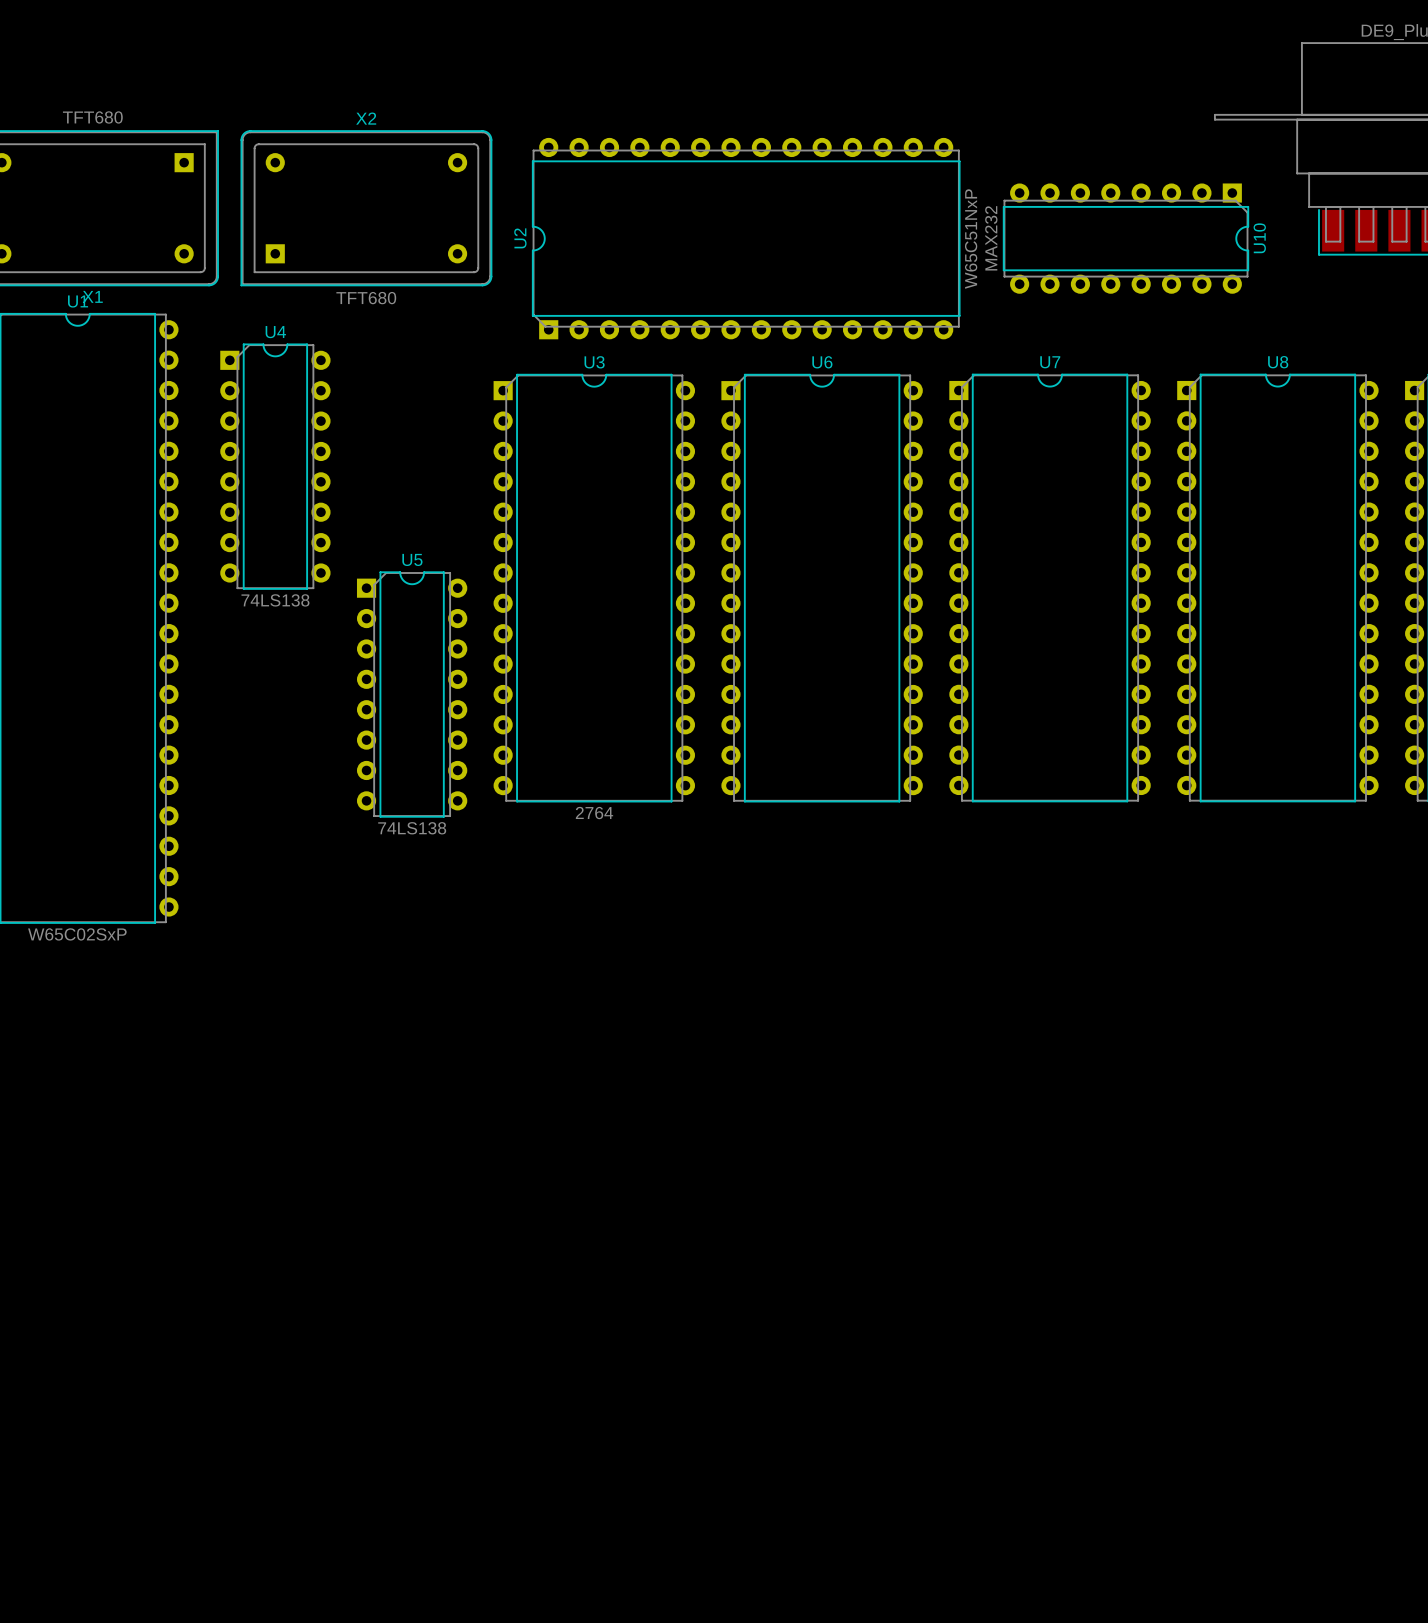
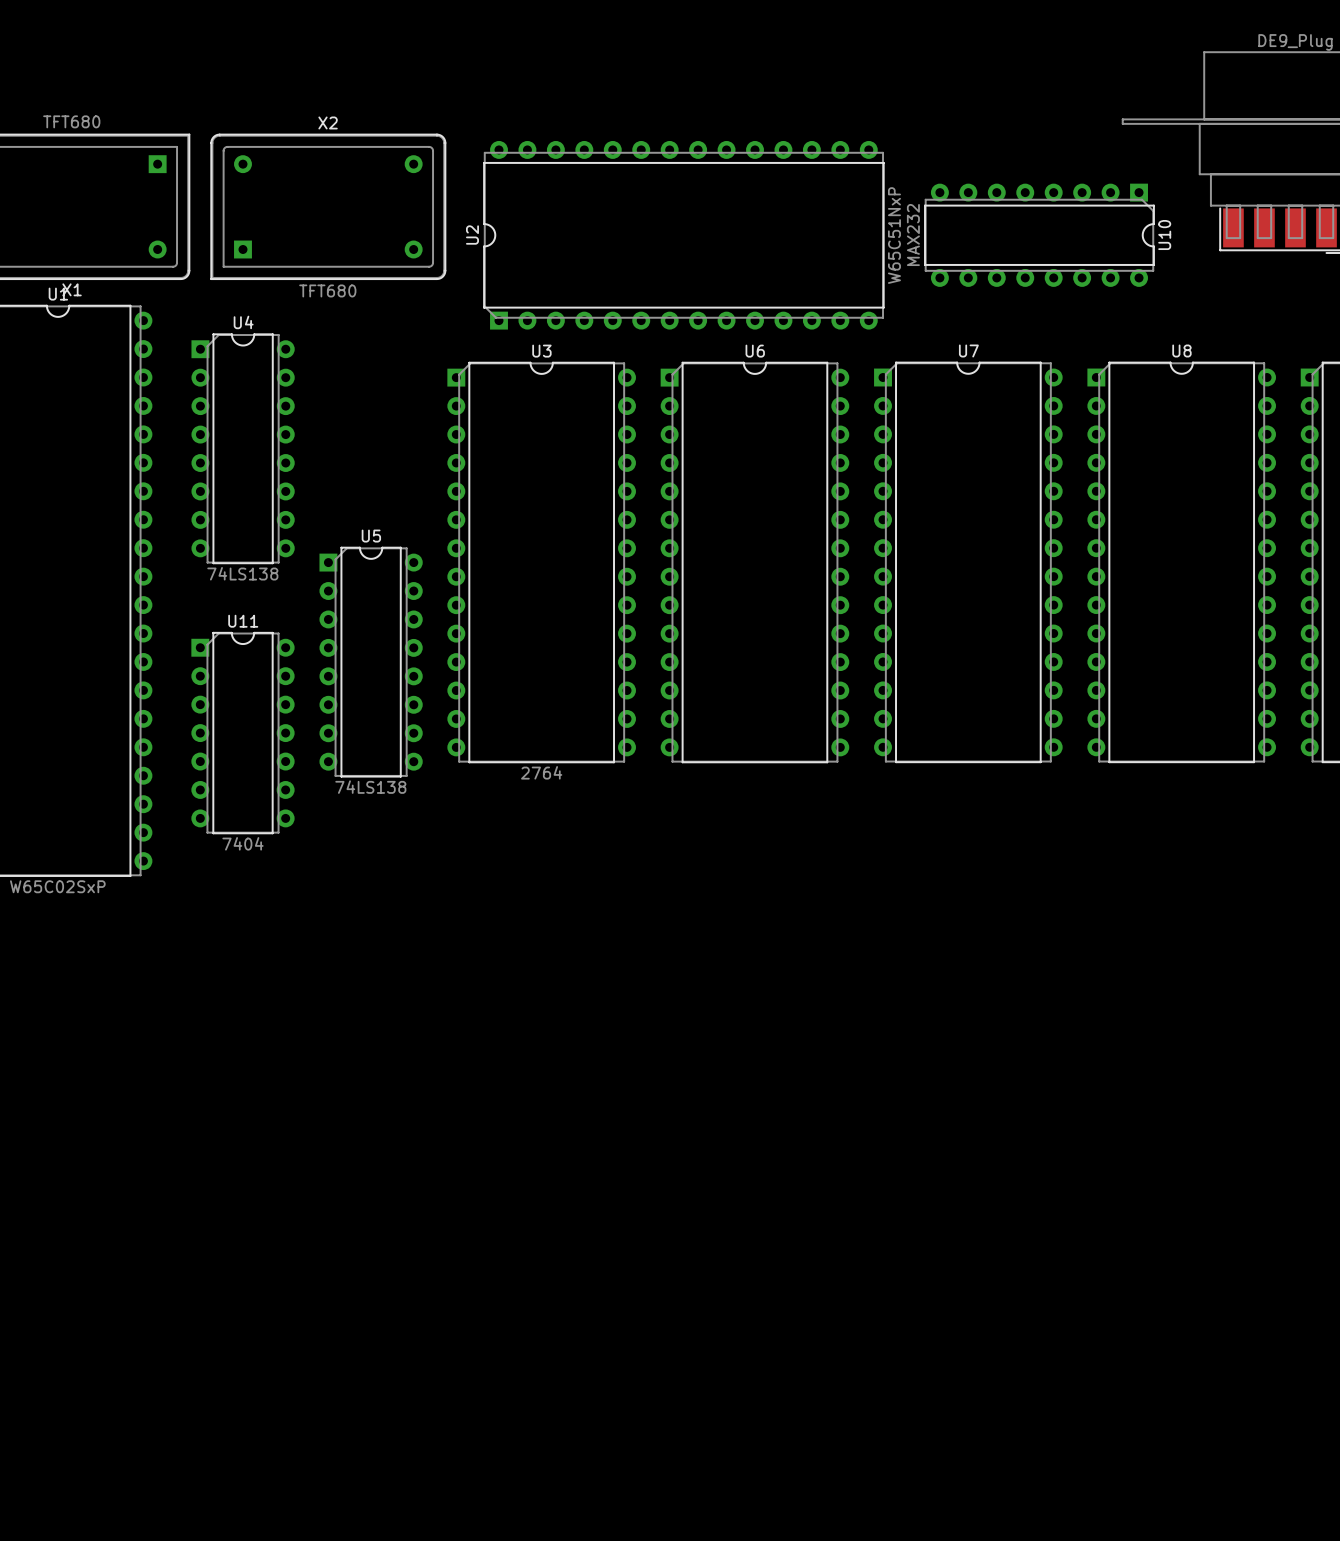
U11: none -> 7404 (242, 733)

